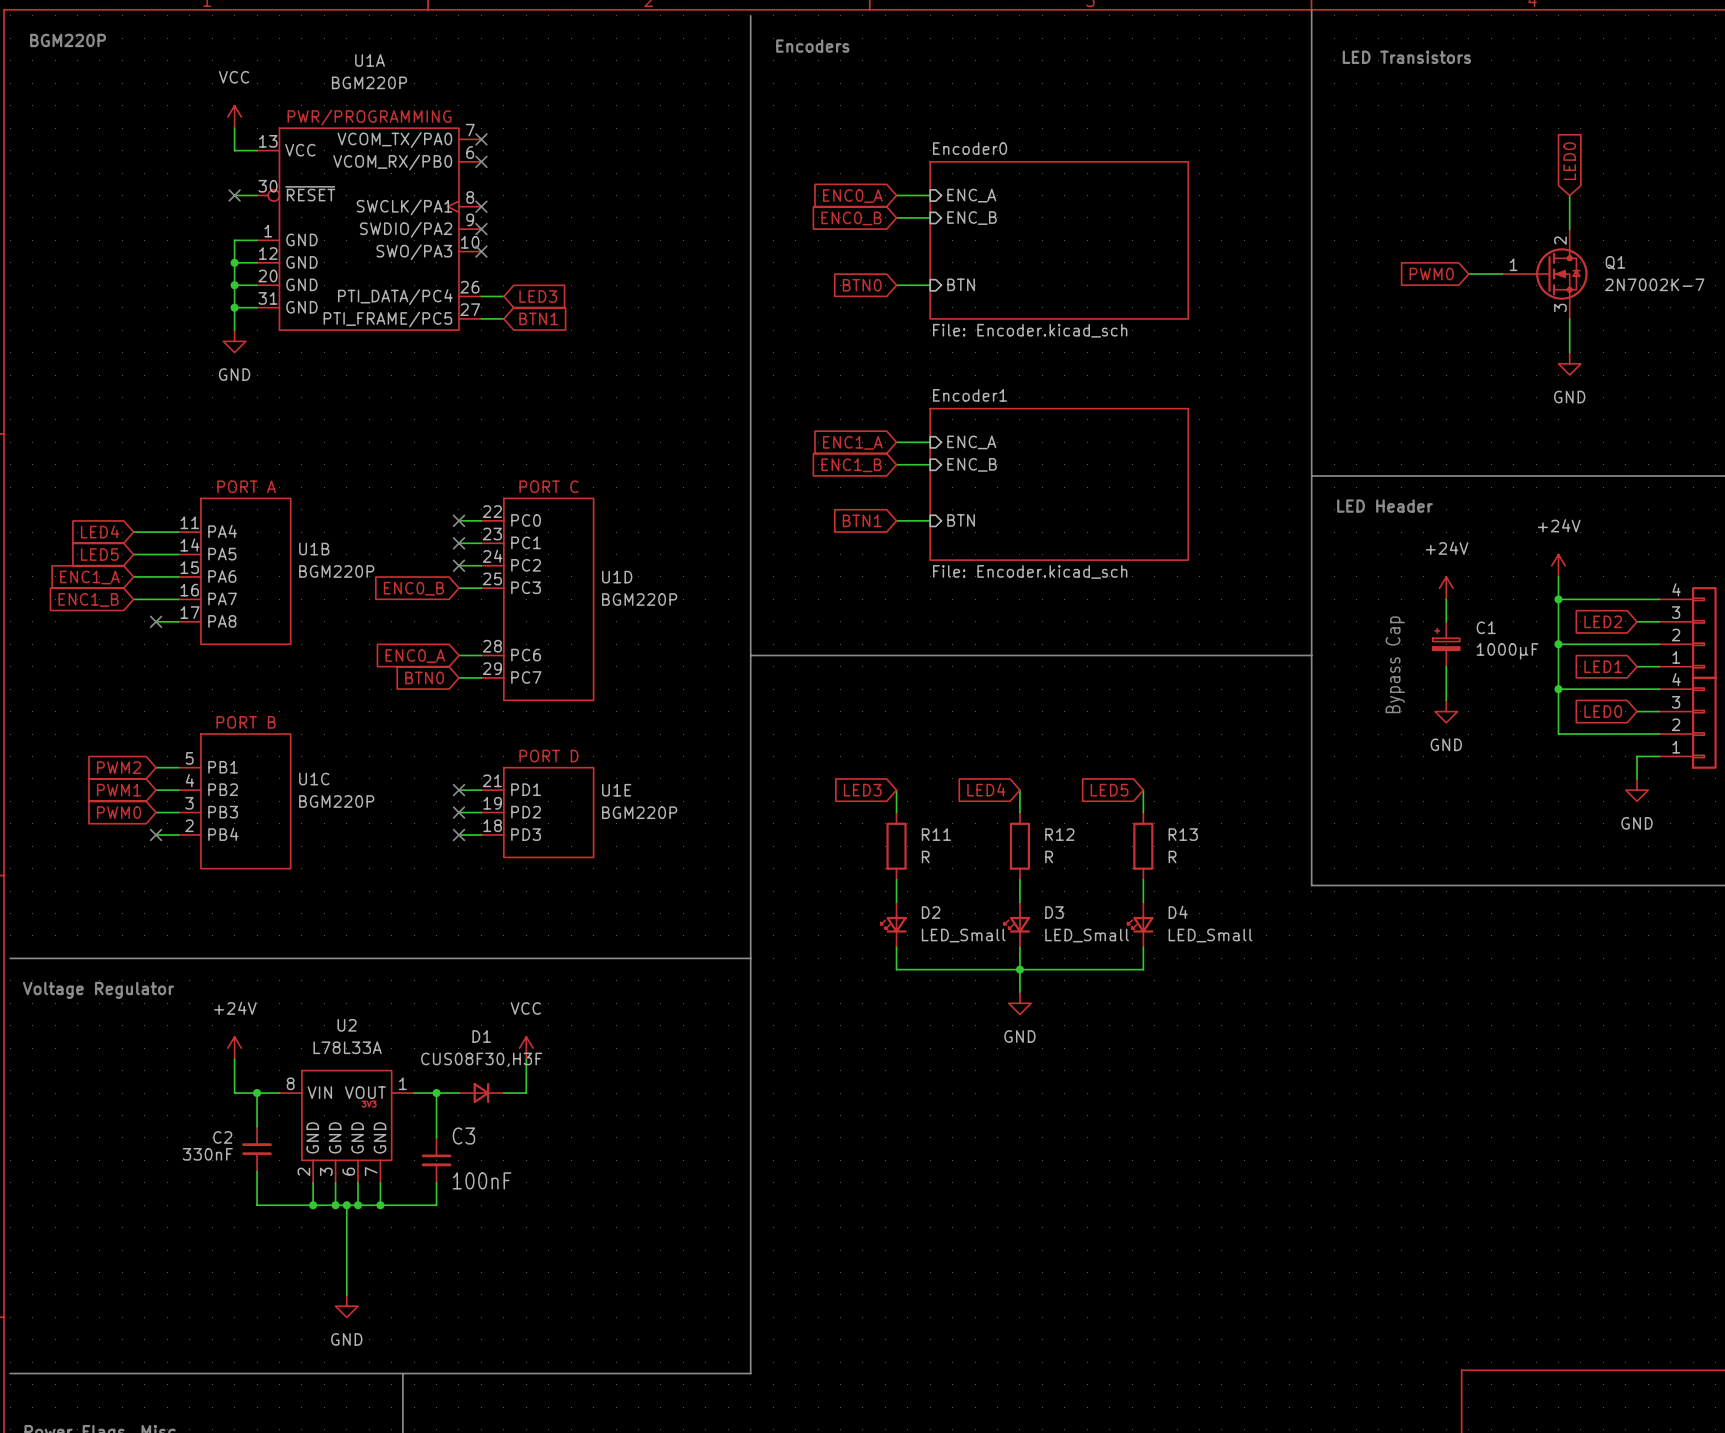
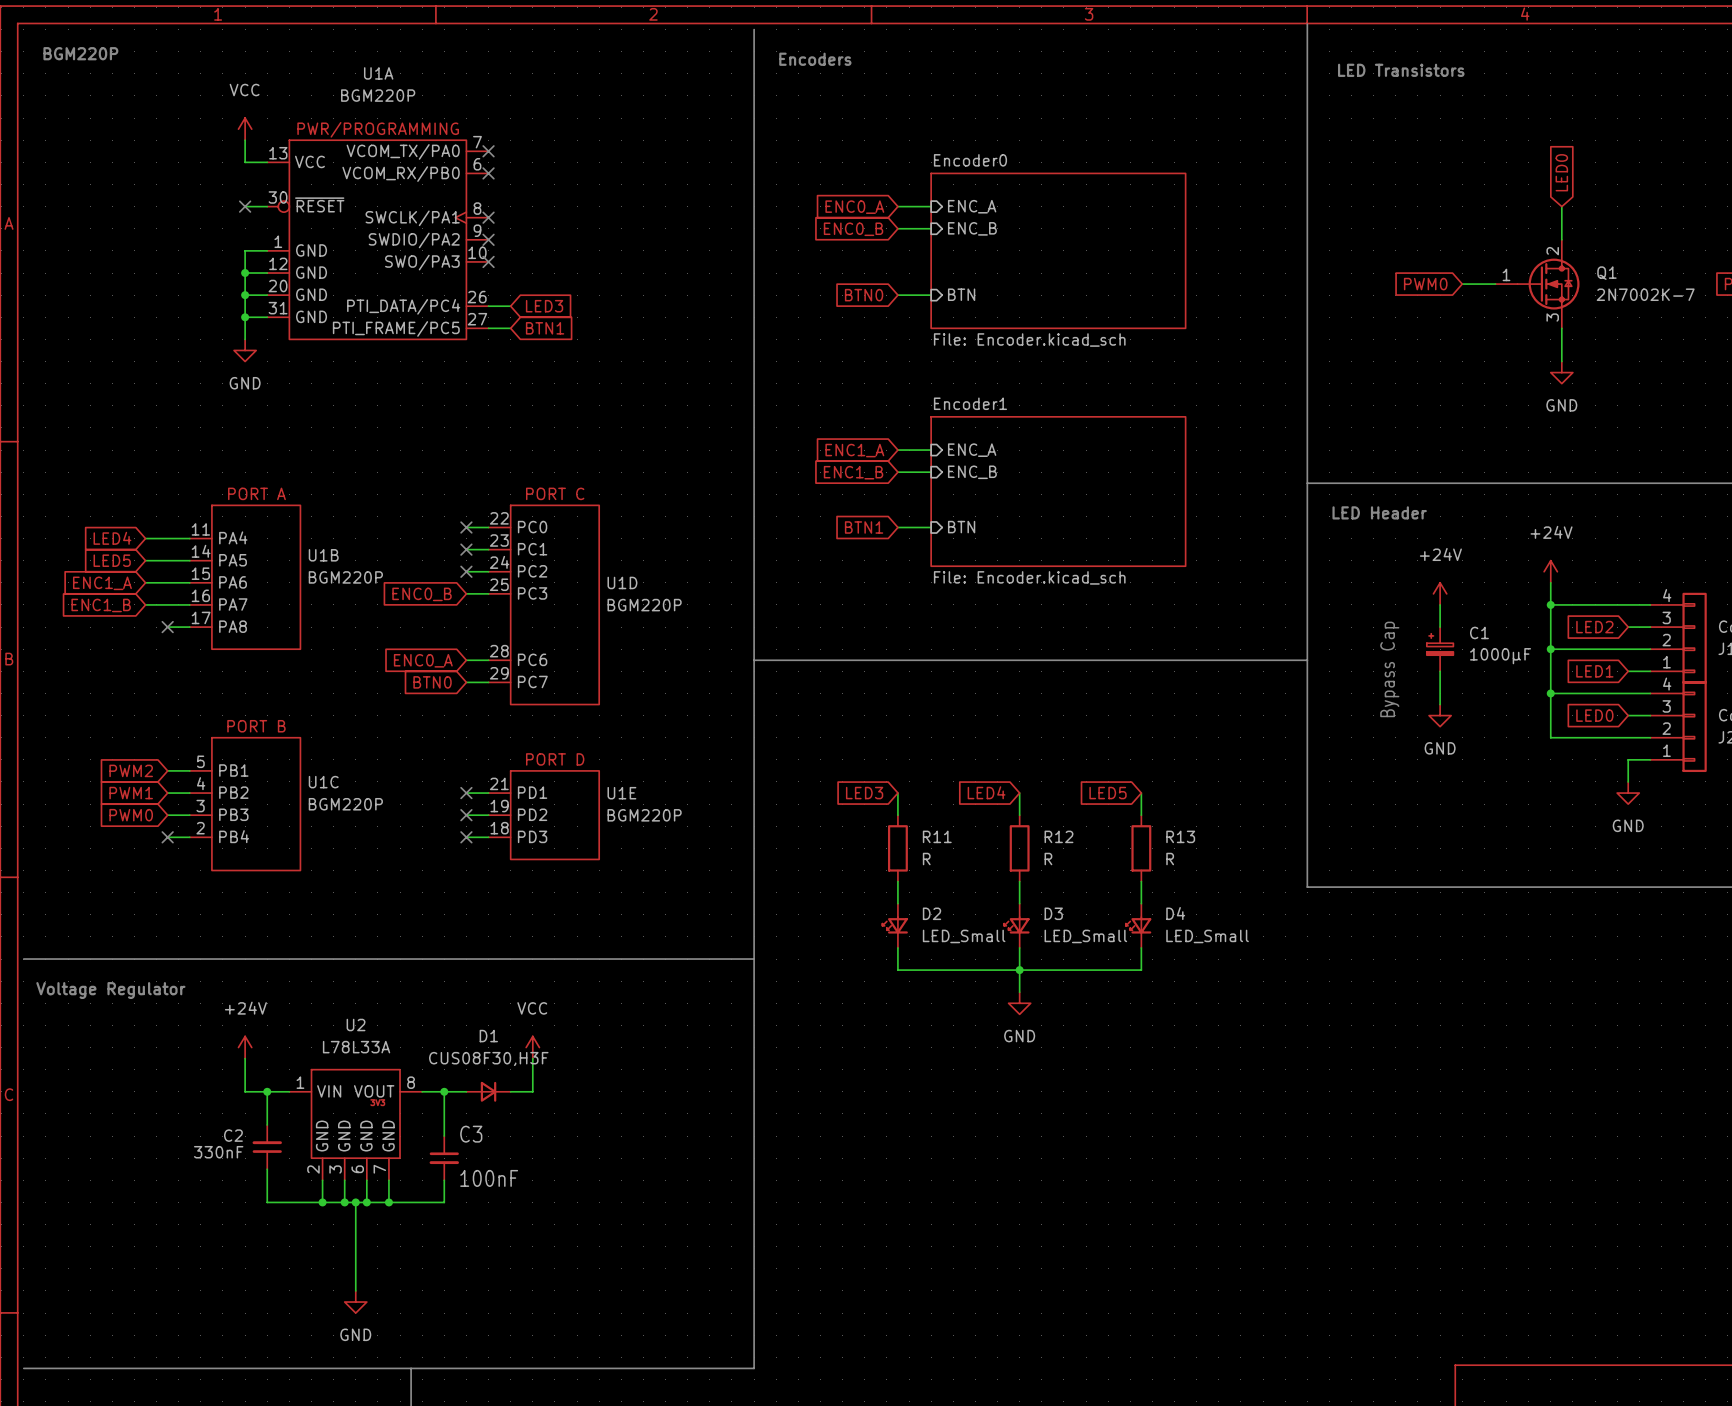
U2 pin number: 8 (290, 1083) -> 1 (300, 1082)
U2 pin number: 1 (402, 1083) -> 8 (411, 1082)

